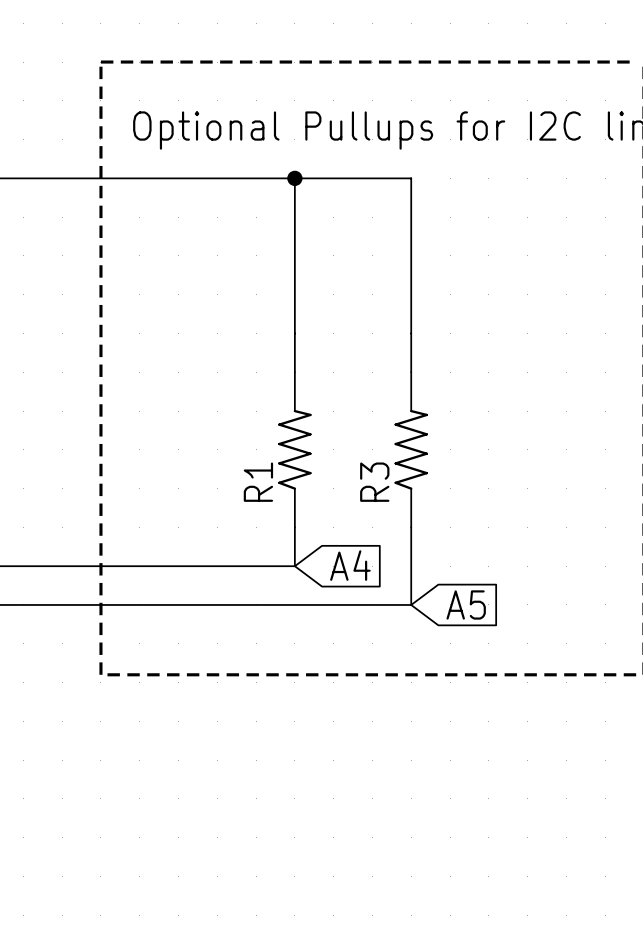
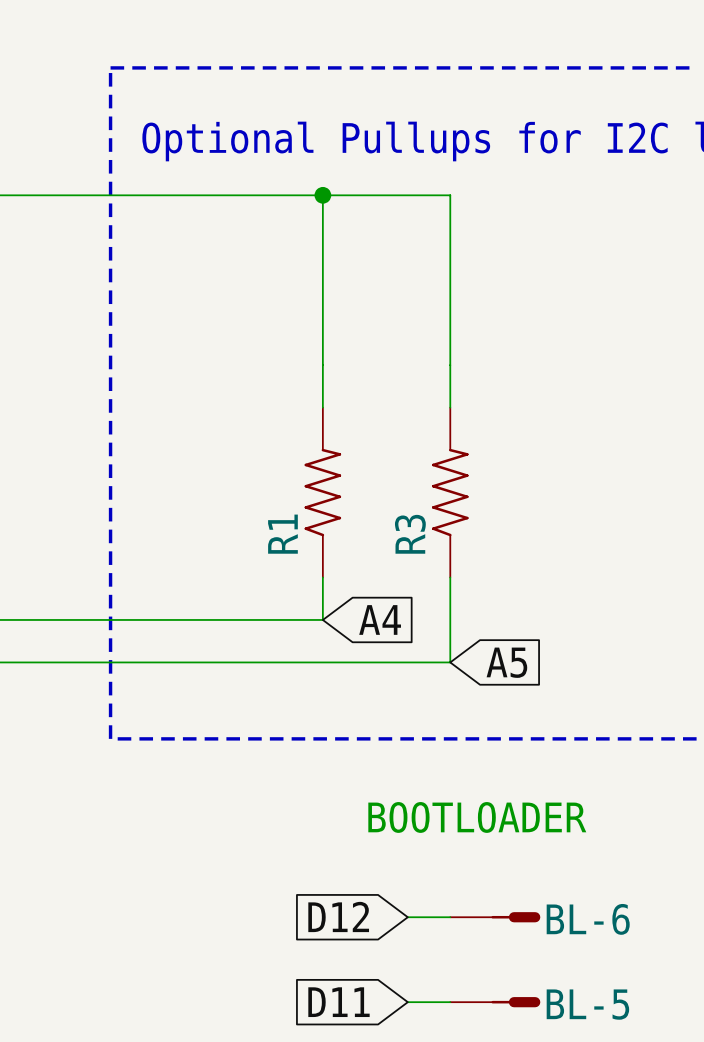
text: none -> BOOTLOADER (477, 817)
global label: none -> D12 (338, 916)
wire: none -> (407, 917) (450, 917)
BL-6: none -> (495, 917)
global label: none -> D11 (338, 1002)
wire: none -> (407, 1002) (450, 1002)
BL-5: none -> (495, 1002)

